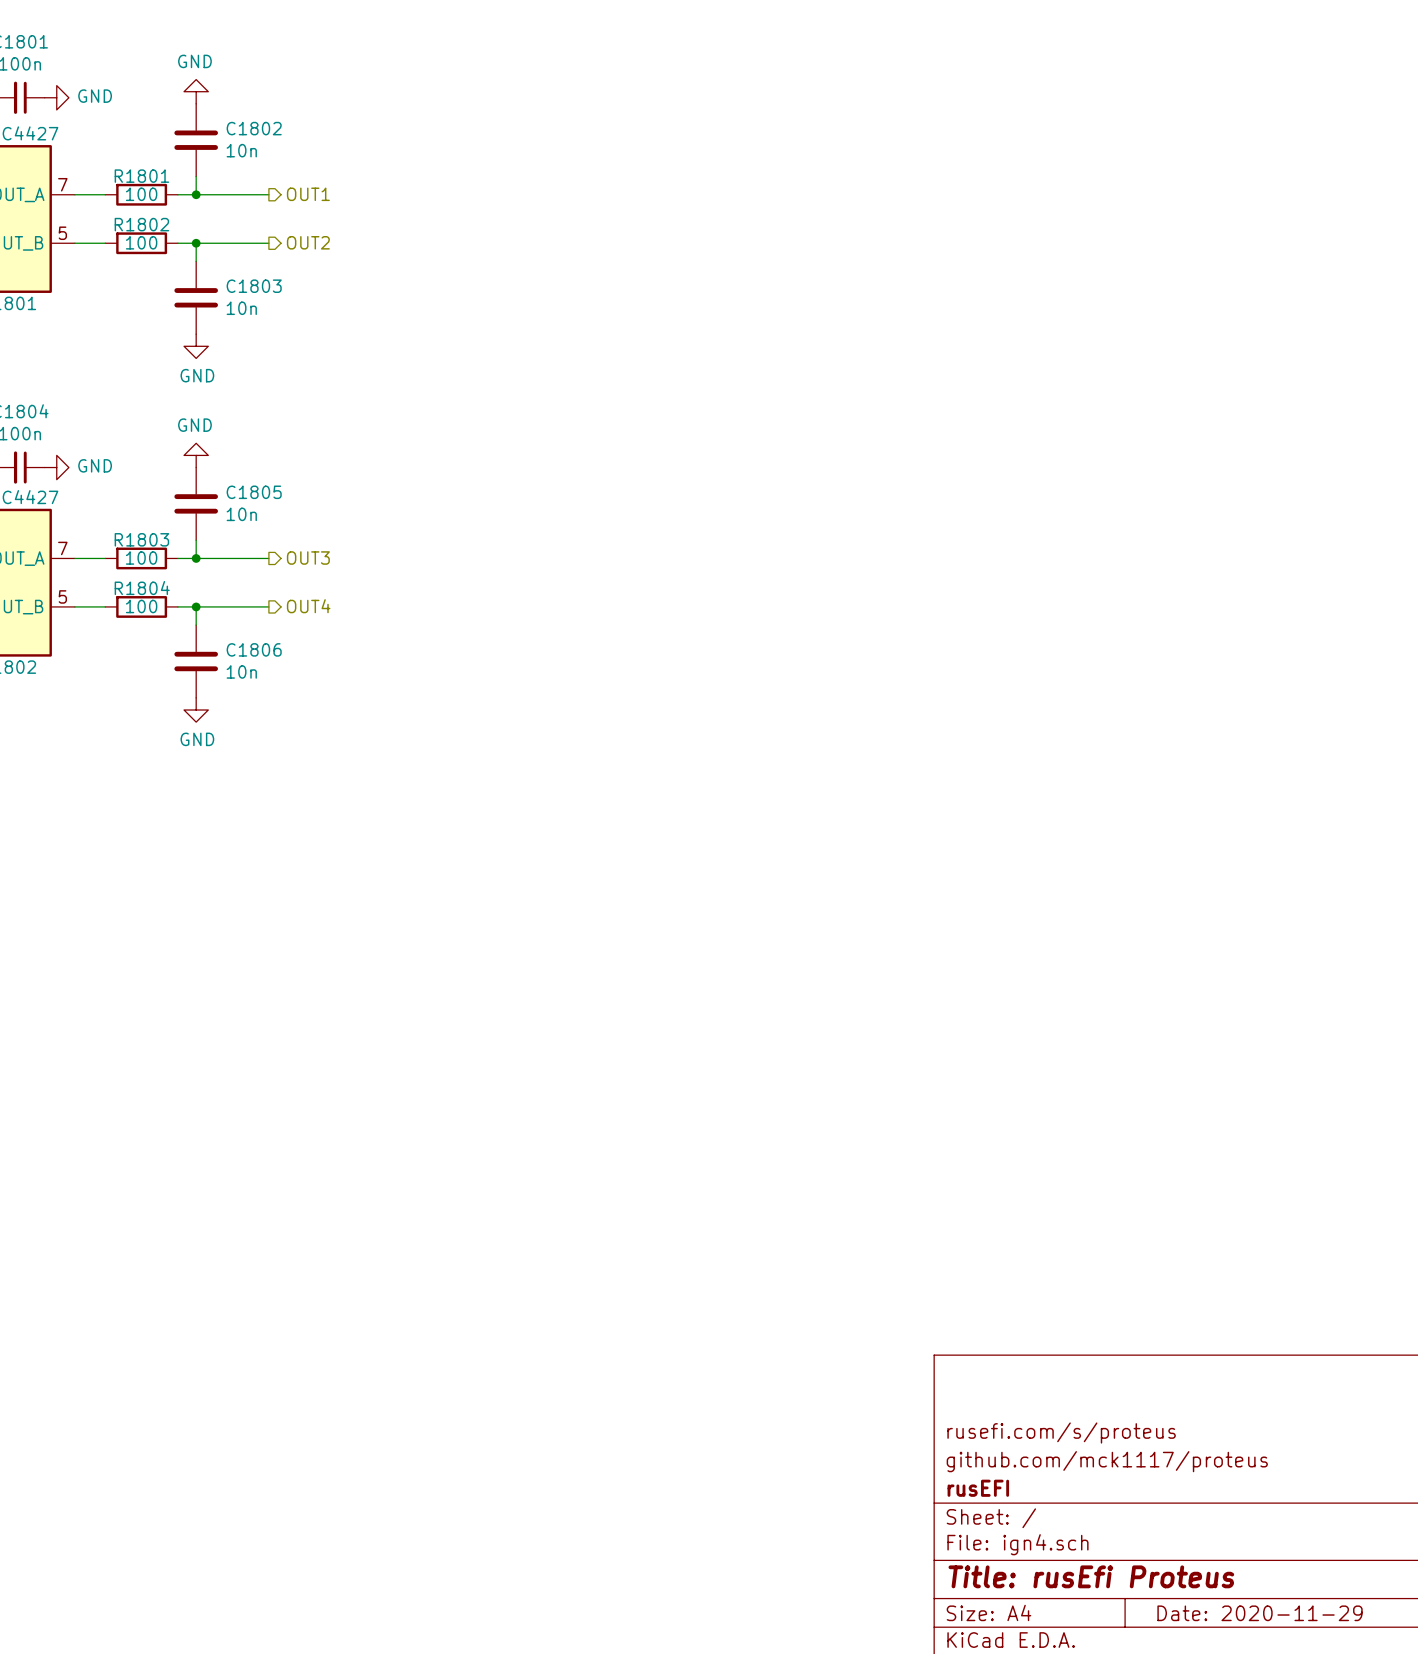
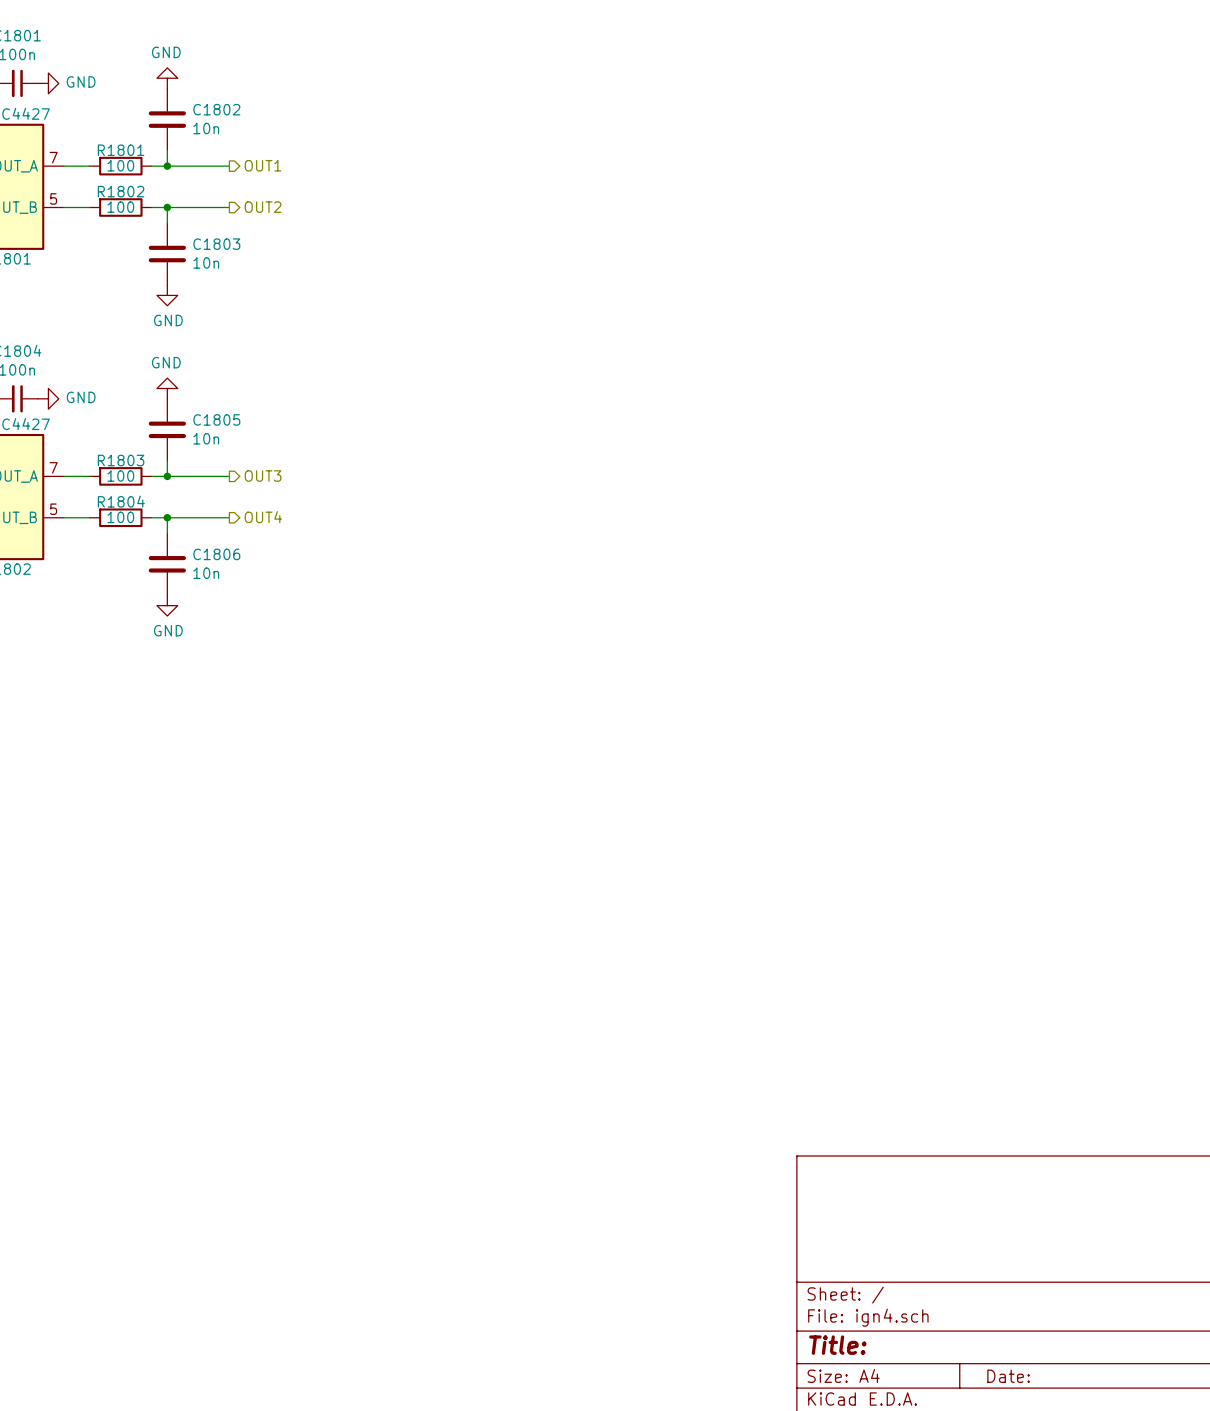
title block: rusefi.com/s/proteus (1061, 1433) -> none
title block: github.com/mck1117/proteus (1107, 1461) -> none
title block: rusEFI (978, 1488) -> none
title block: Title: rusEfi Proteus (1091, 1576) -> Title: (837, 1345)
title block: Date: 2020-11-29 (1260, 1613) -> Date: (1008, 1376)

